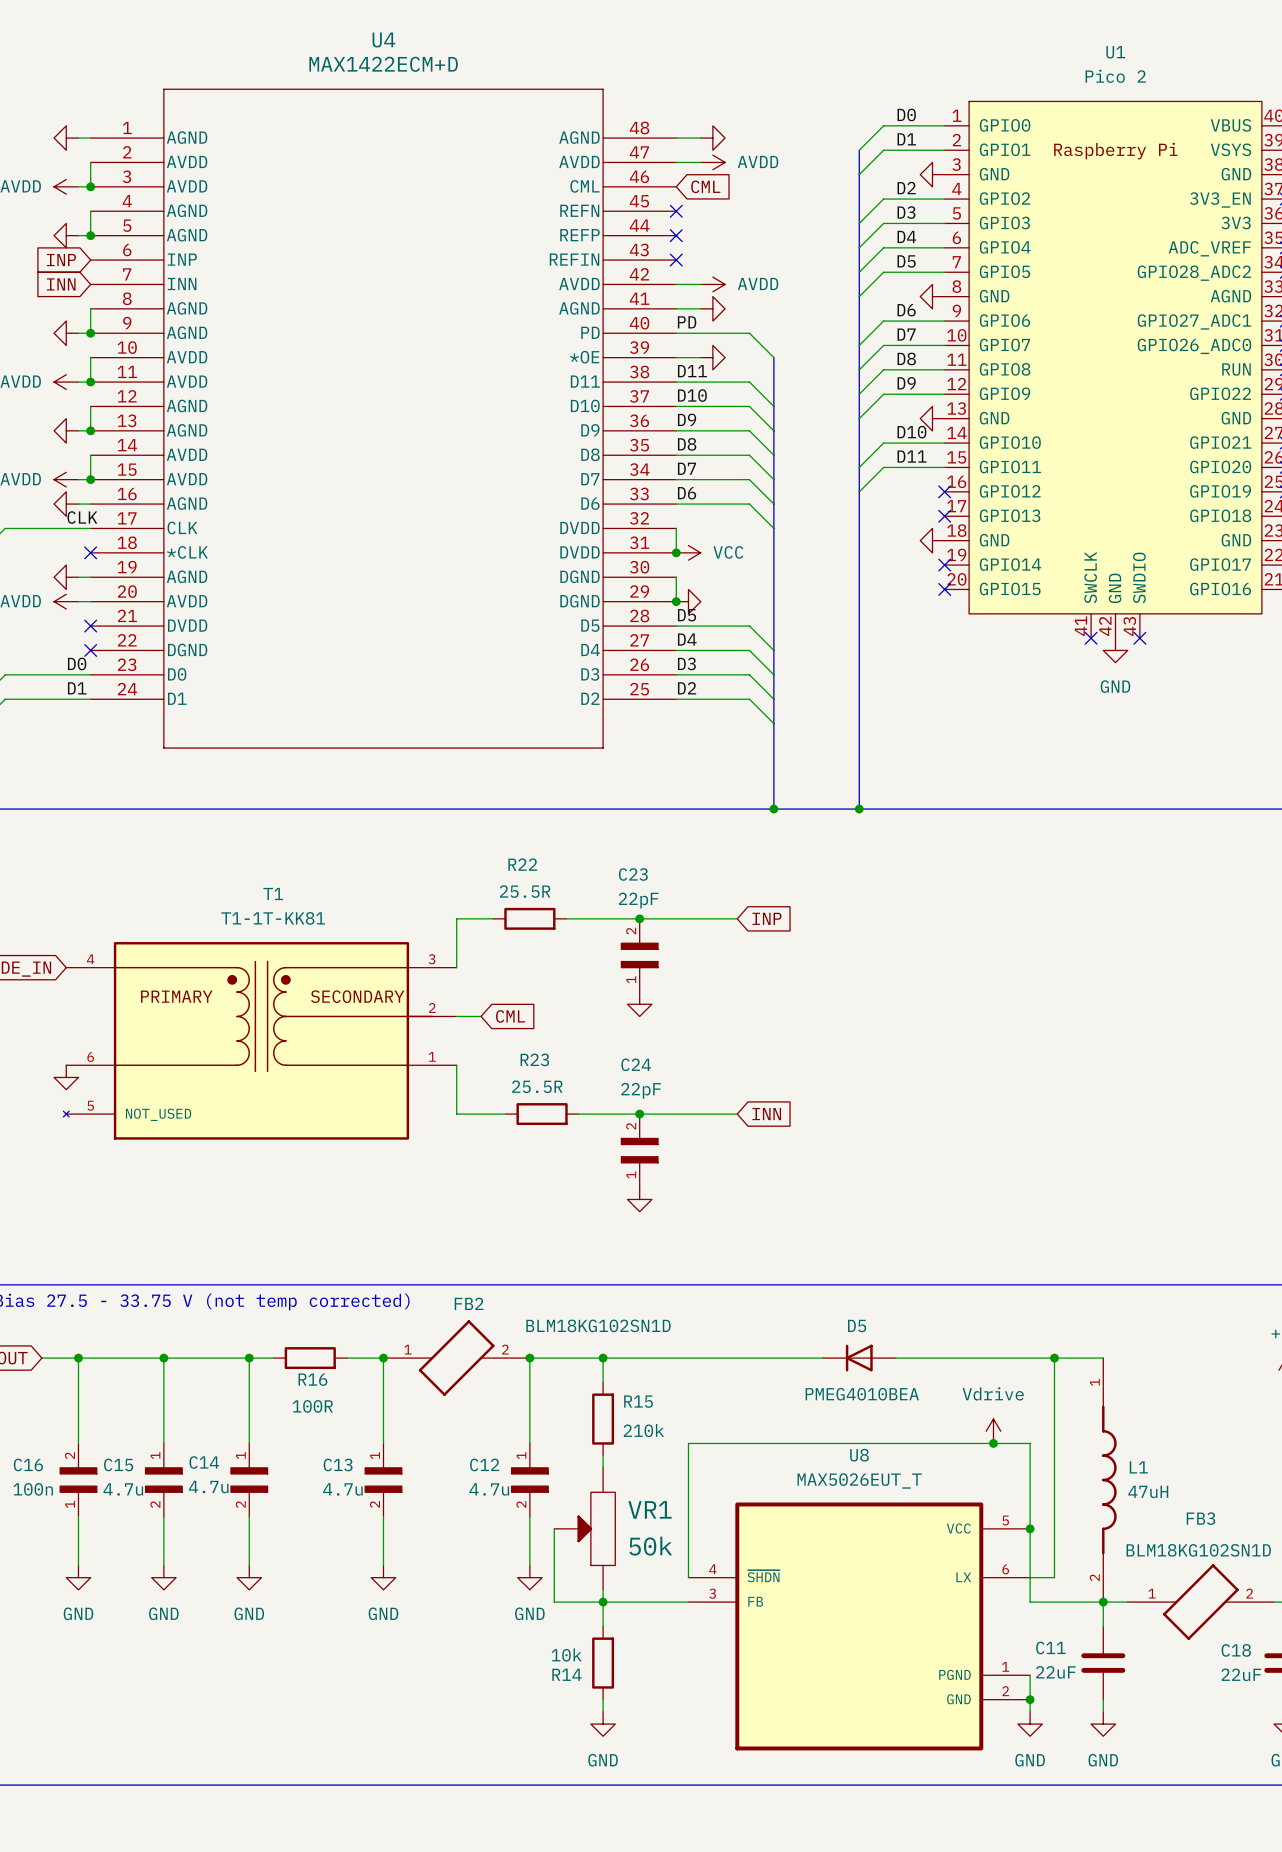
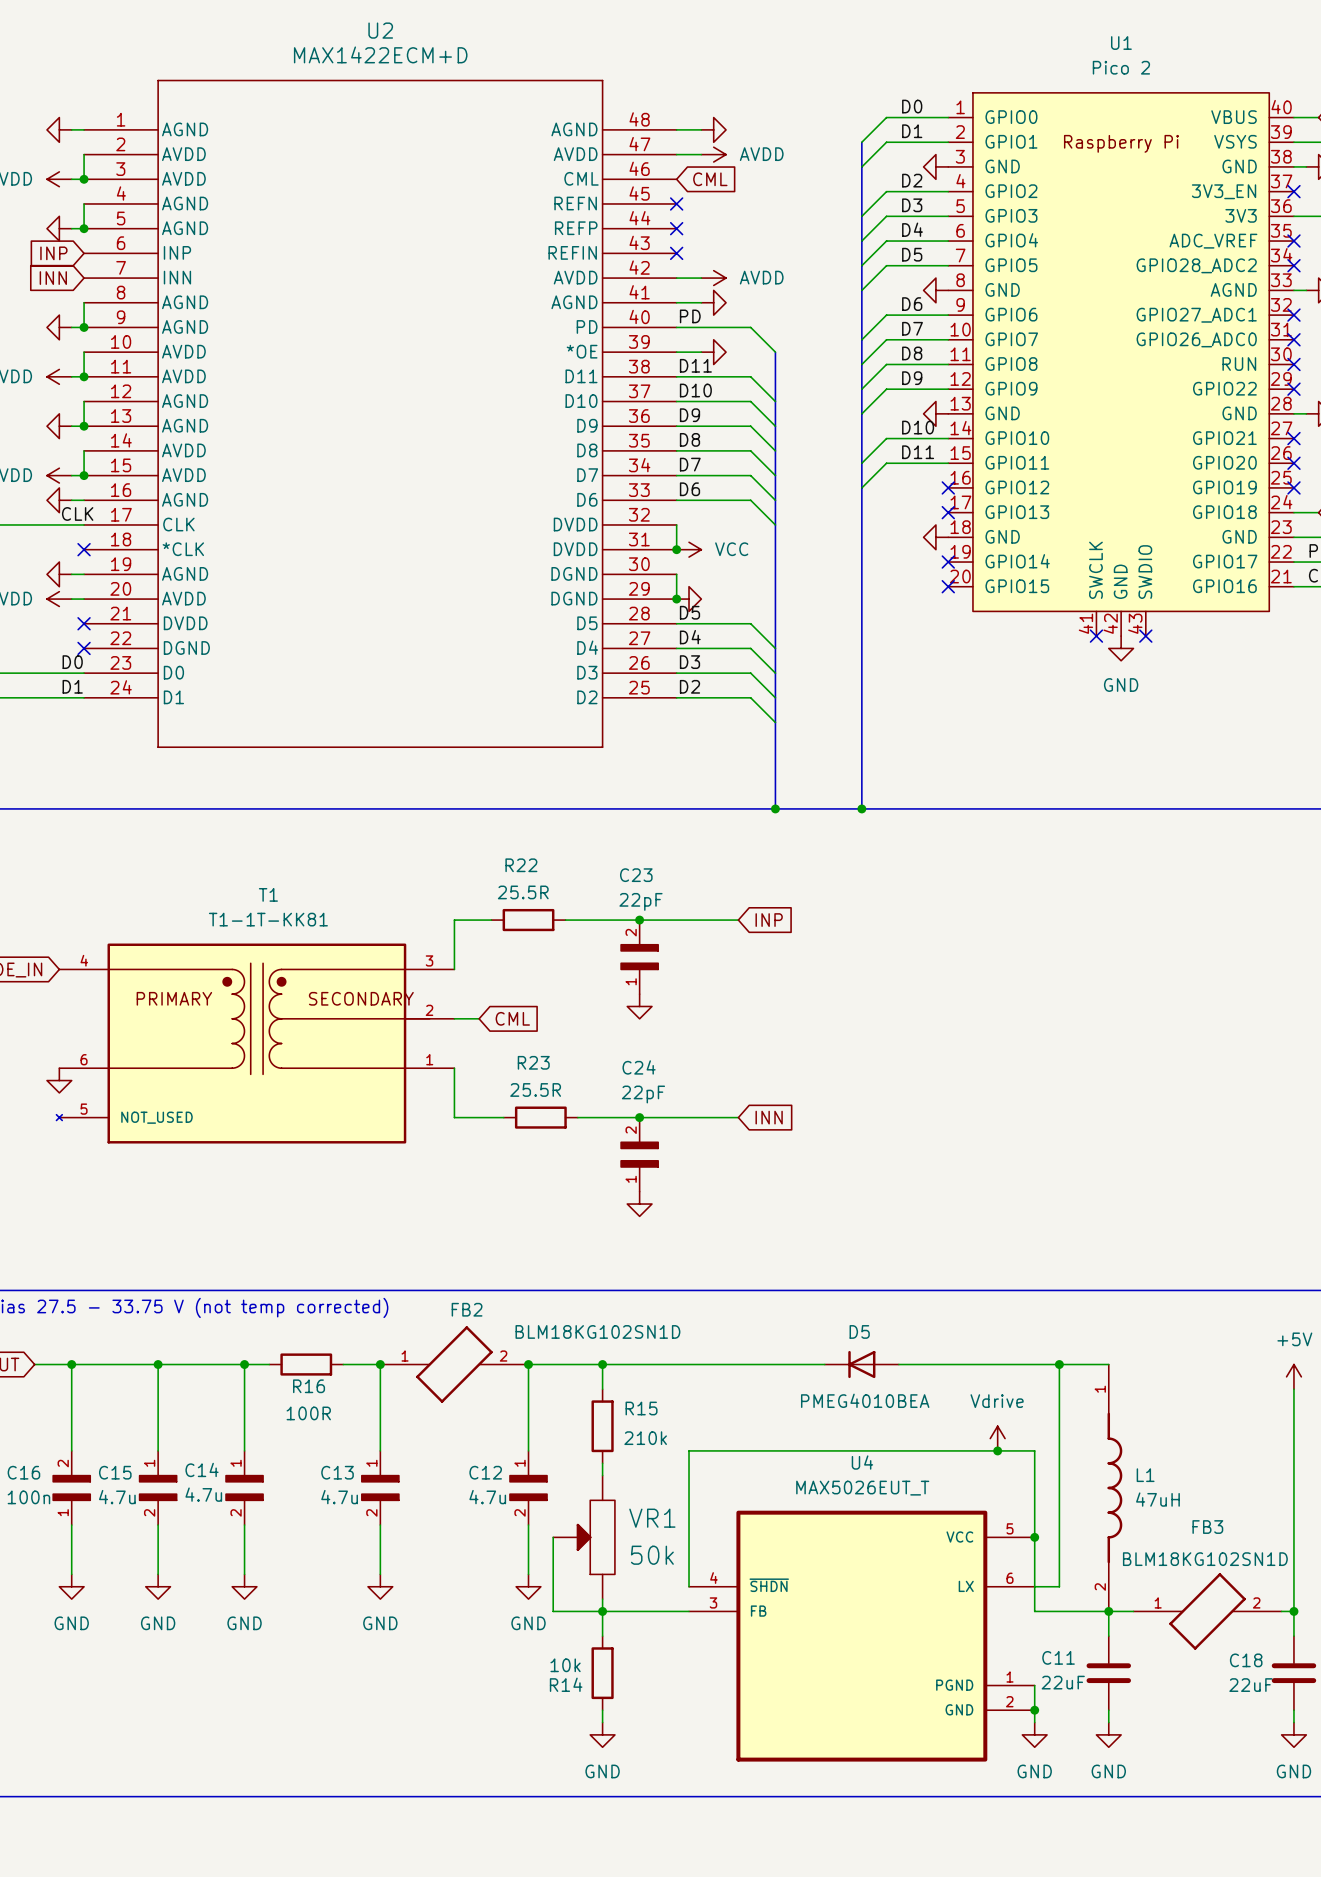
U4 name: U4 (383, 40) -> U2 (380, 30)
U8 name: U8 (859, 1455) -> U4 (862, 1462)

